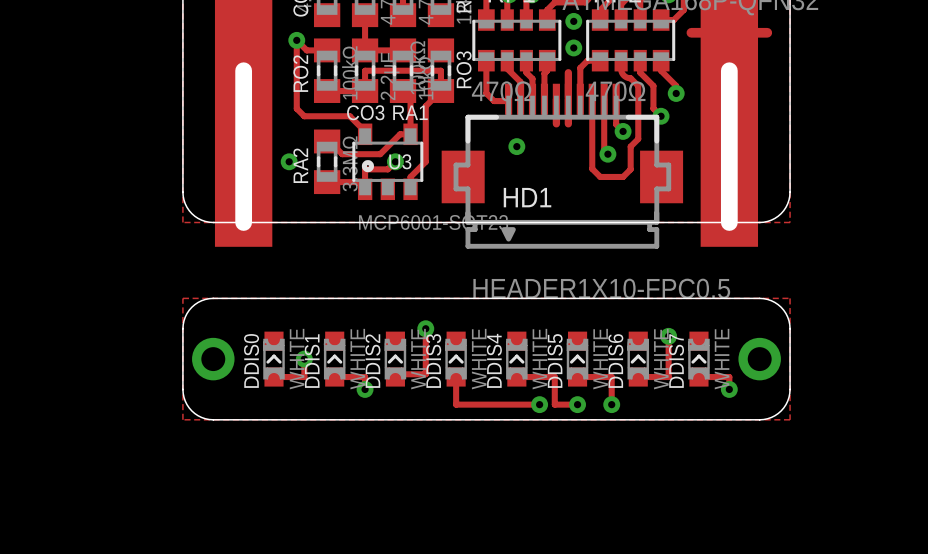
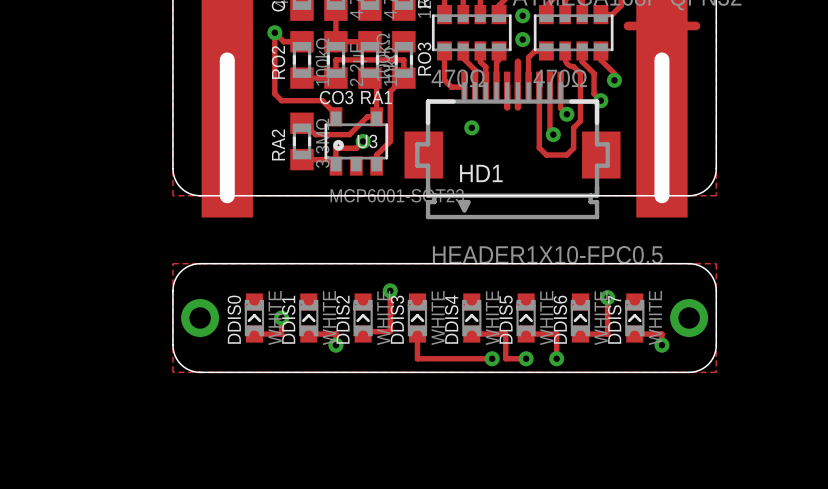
via: (289, 161) -> none

